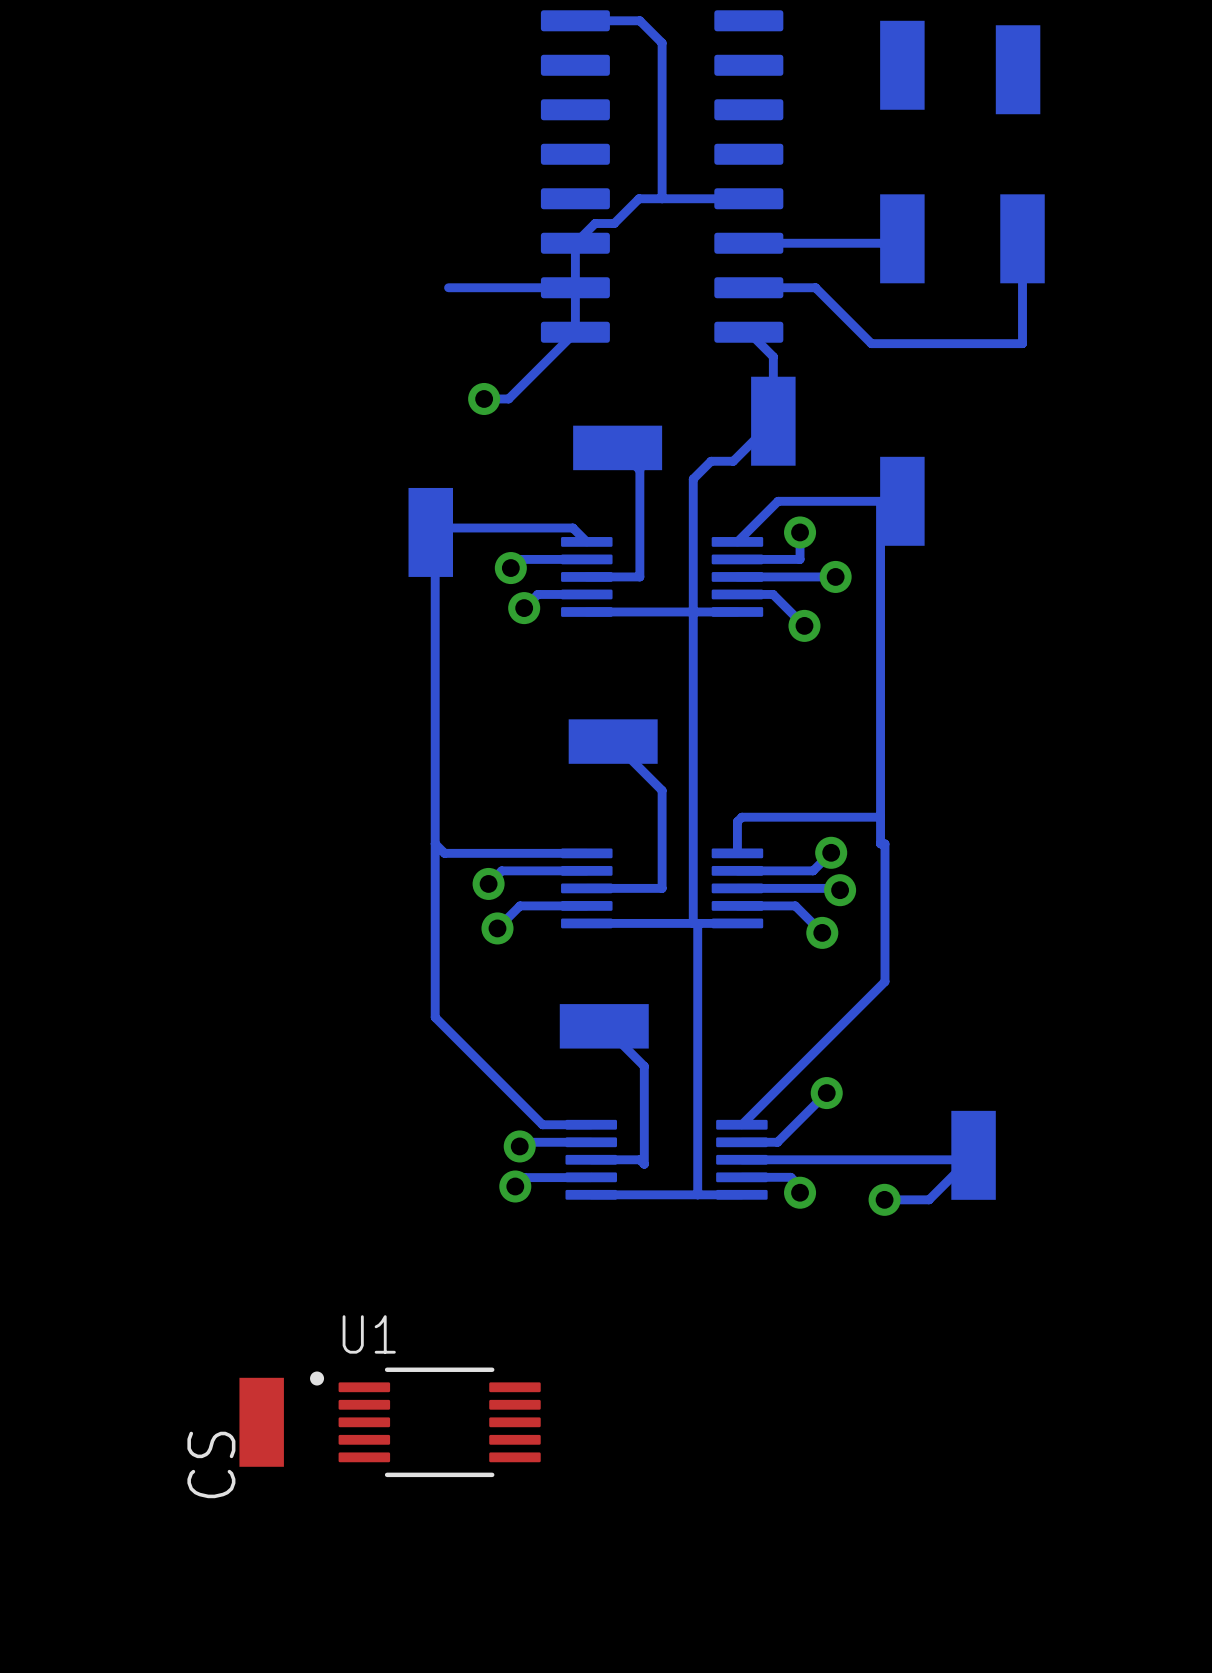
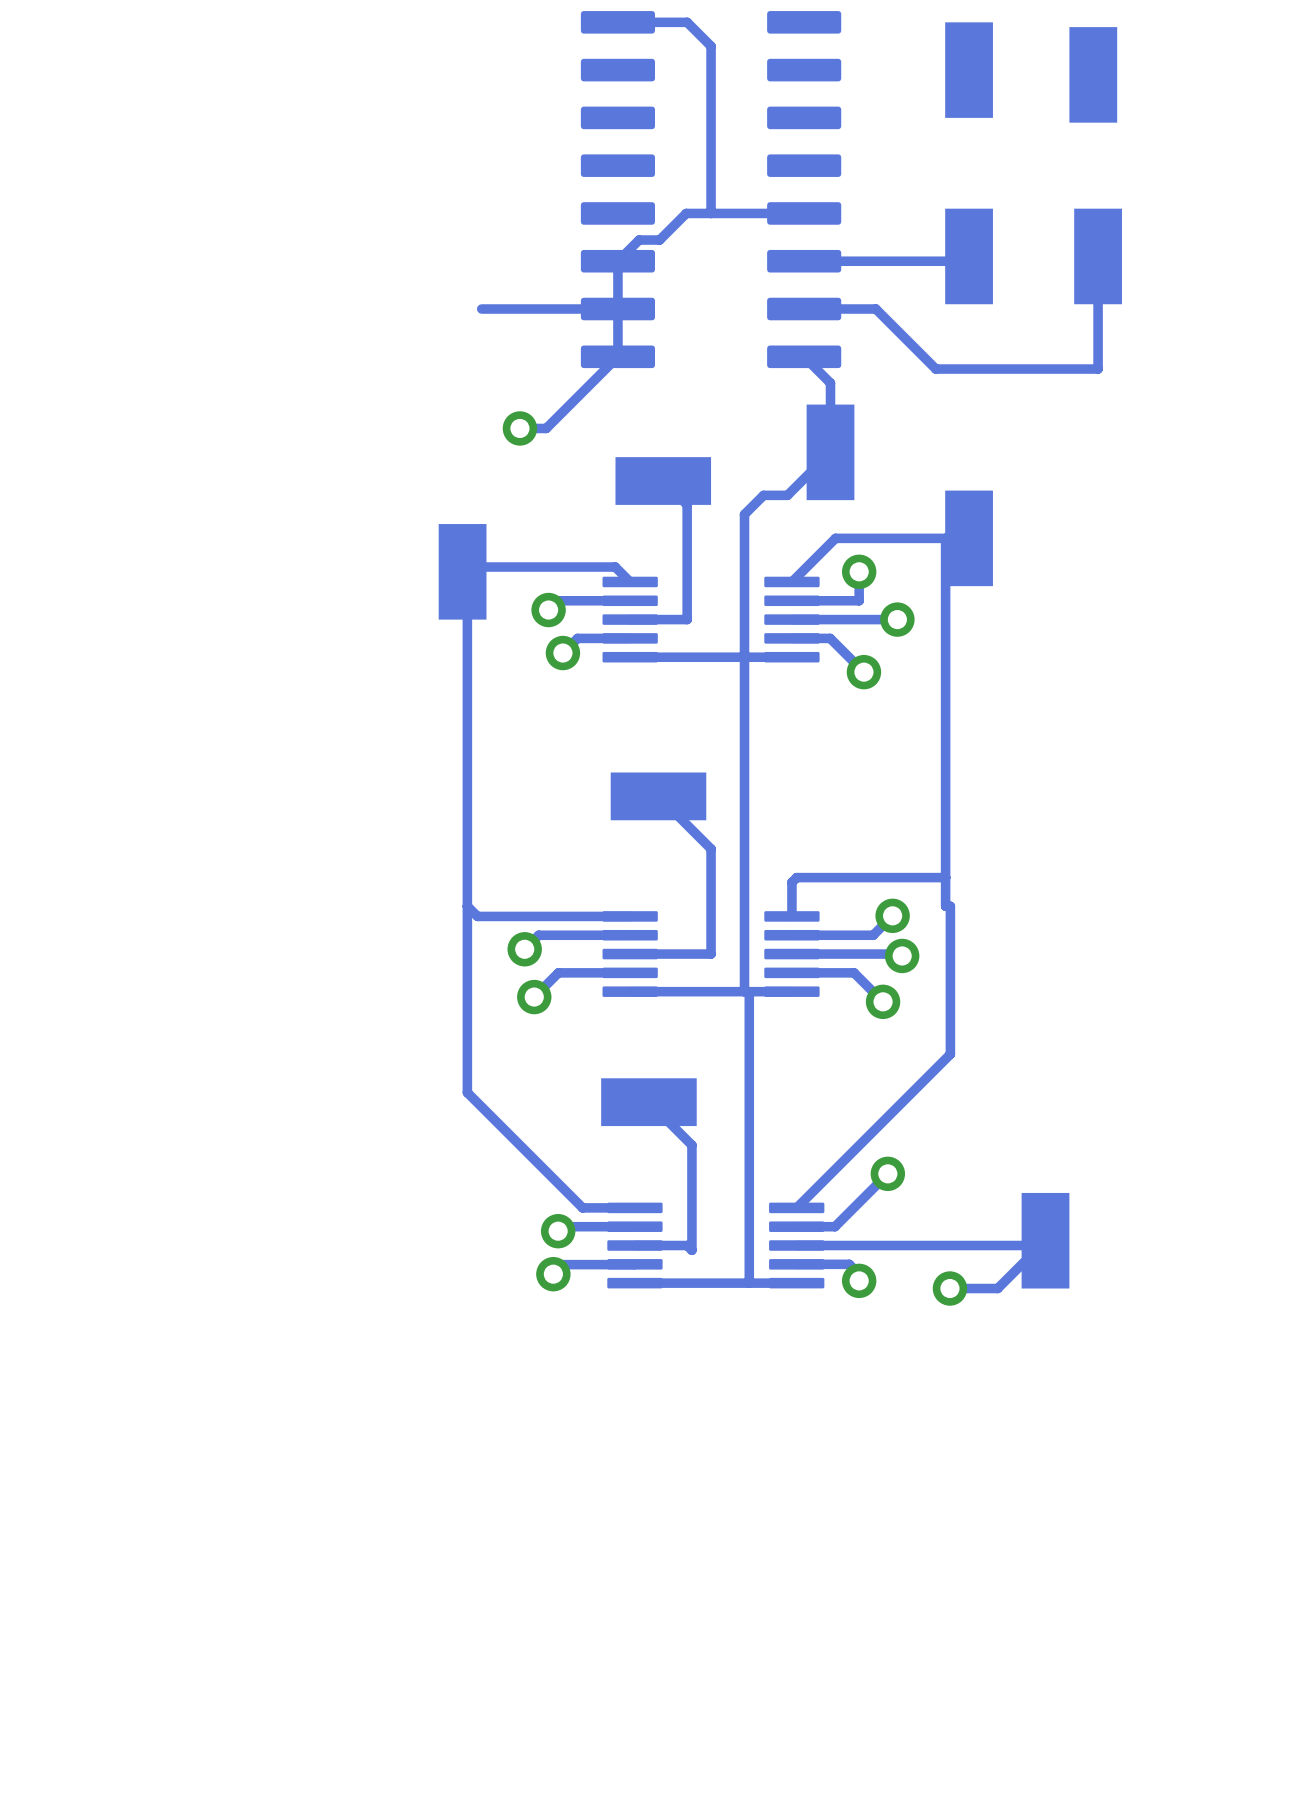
CS: (261, 1422) -> none
U1: (425, 1422) -> none

